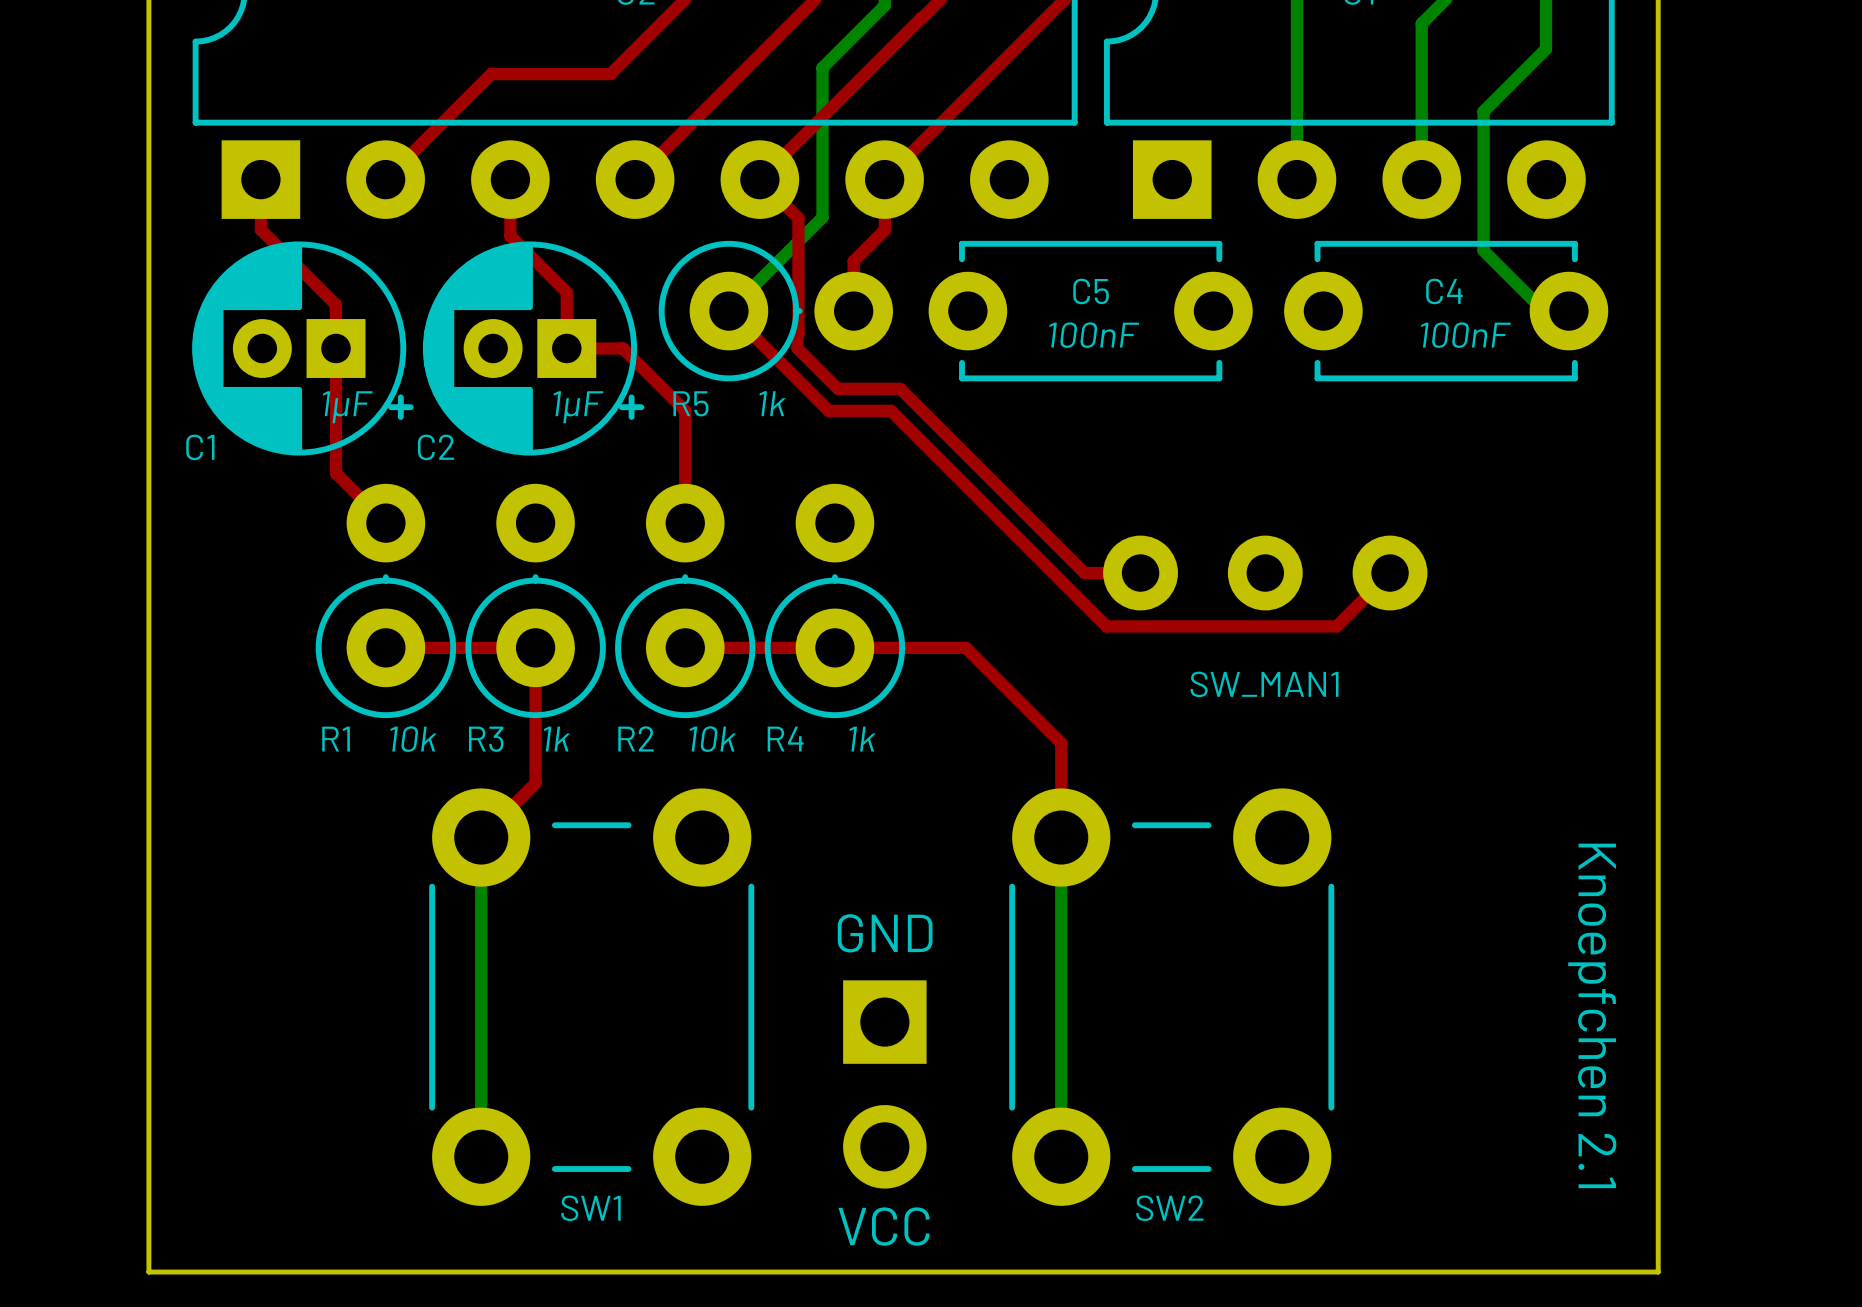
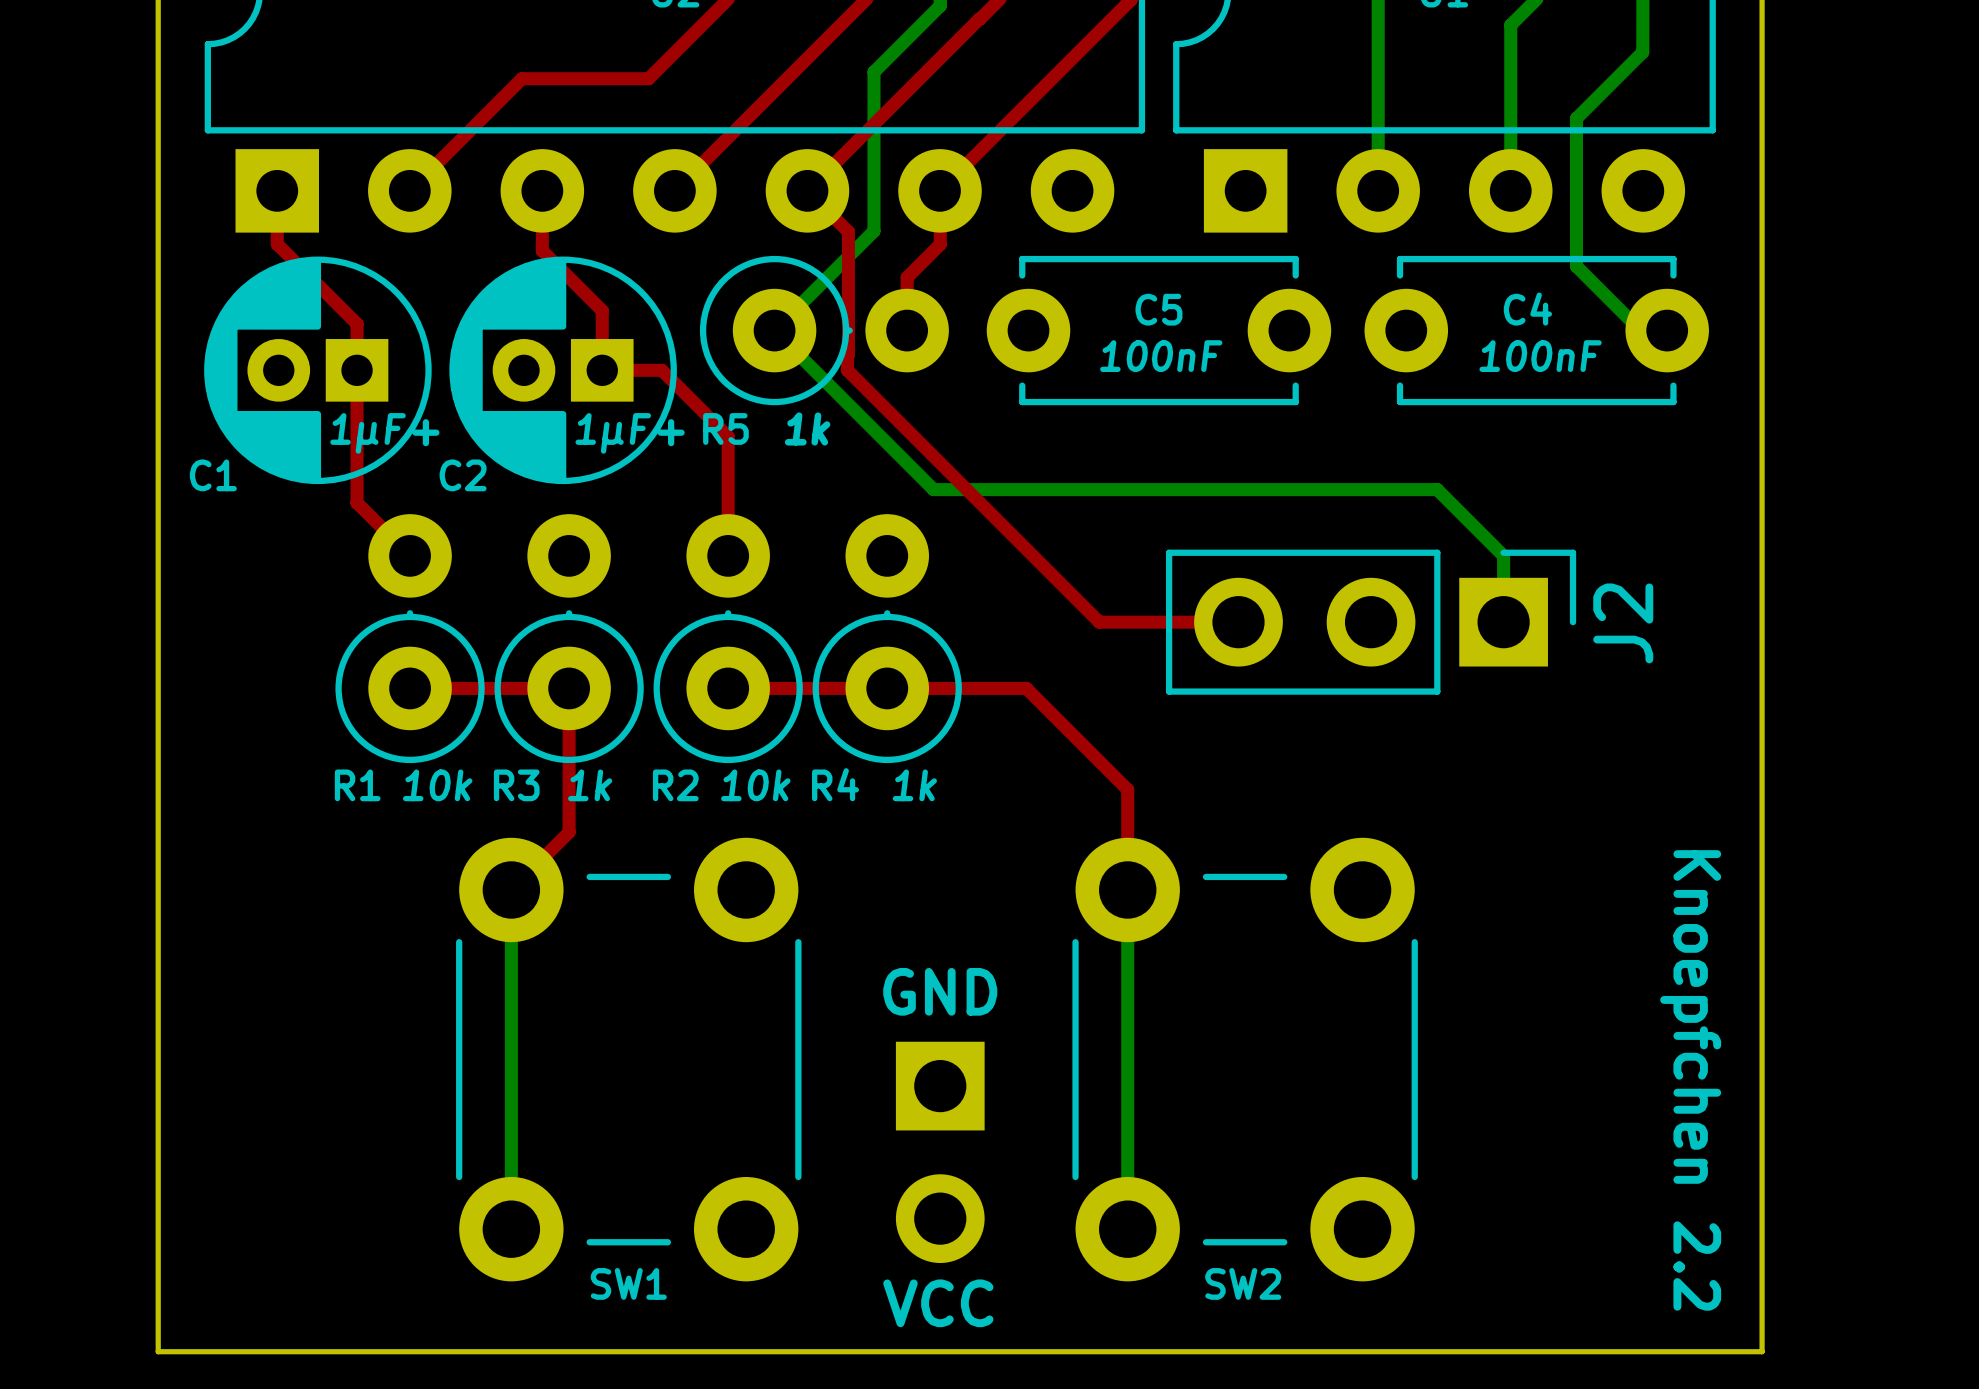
bottom track: none -> (774, 330) (933, 489) (1437, 489) (1503, 555) (1503, 622)
top track: (728, 311) (828, 410) (891, 410) (1106, 626) (1336, 626) (1390, 573) -> none
top track: (837, 388) (900, 388) (1084, 573) (1140, 573) -> (890, 413) (1099, 622) (1238, 622)
SW_MAN1: (1265, 573) -> none
J2: none -> (1371, 622)
text: Knoepfchen 2.1 (1592, 1015) -> Knoepfchen 2.2 (1690, 1080)

